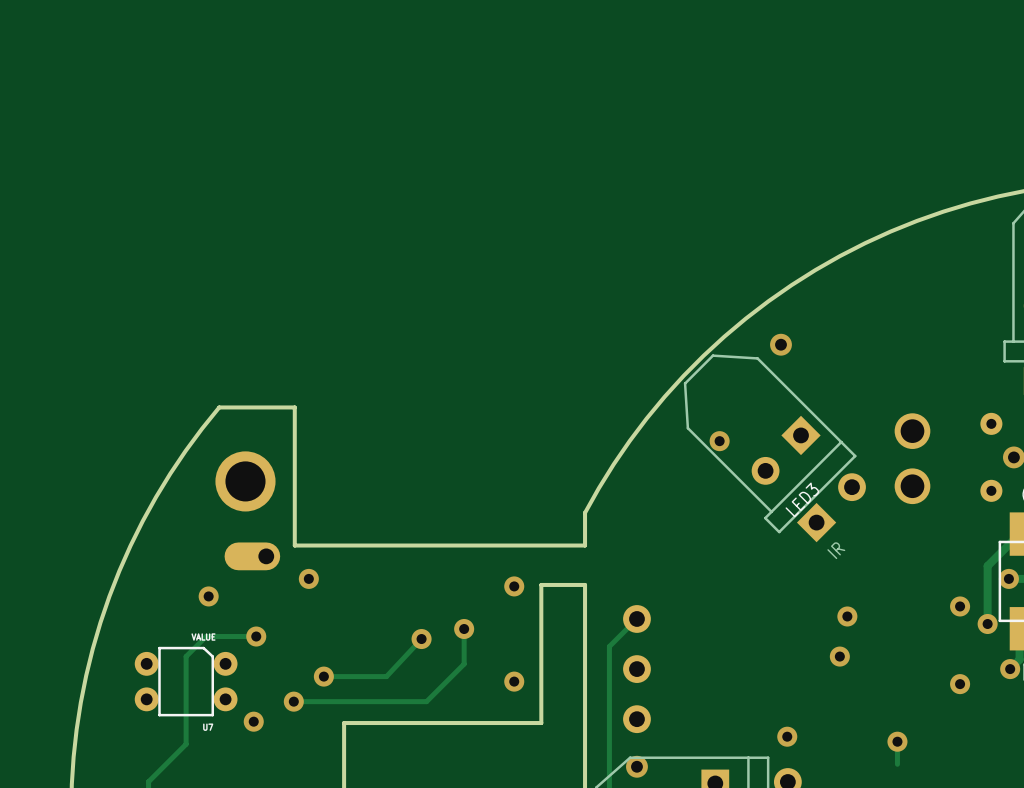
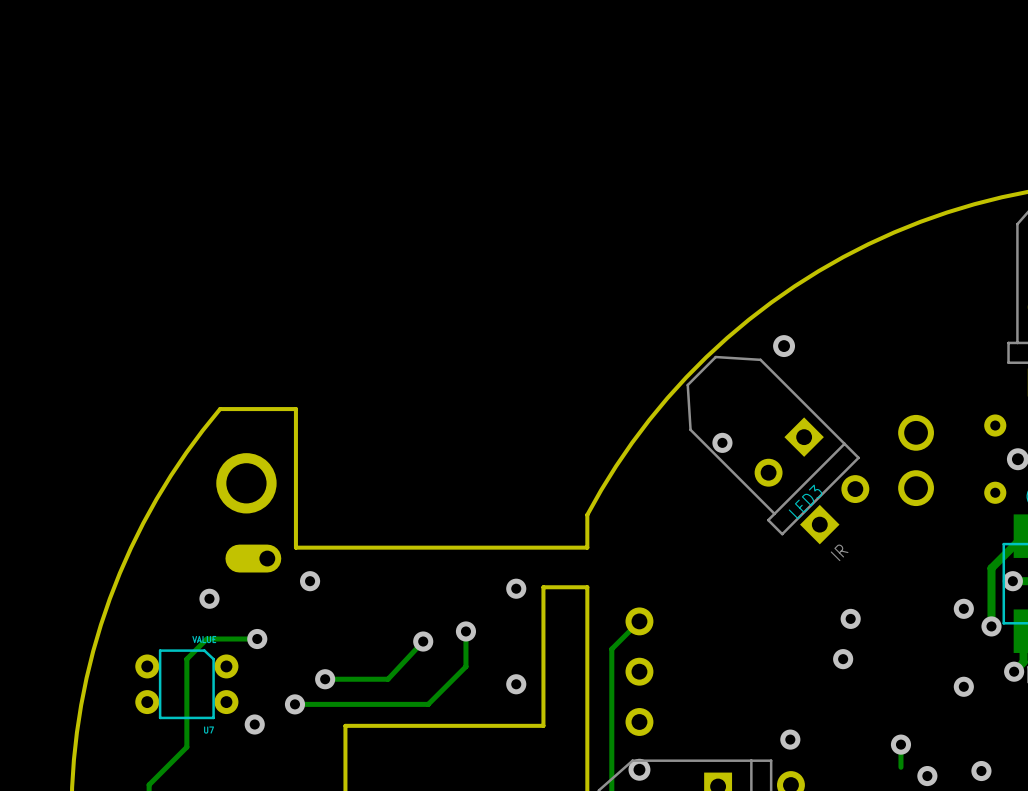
via: none -> (981, 771)
via: none -> (927, 776)

